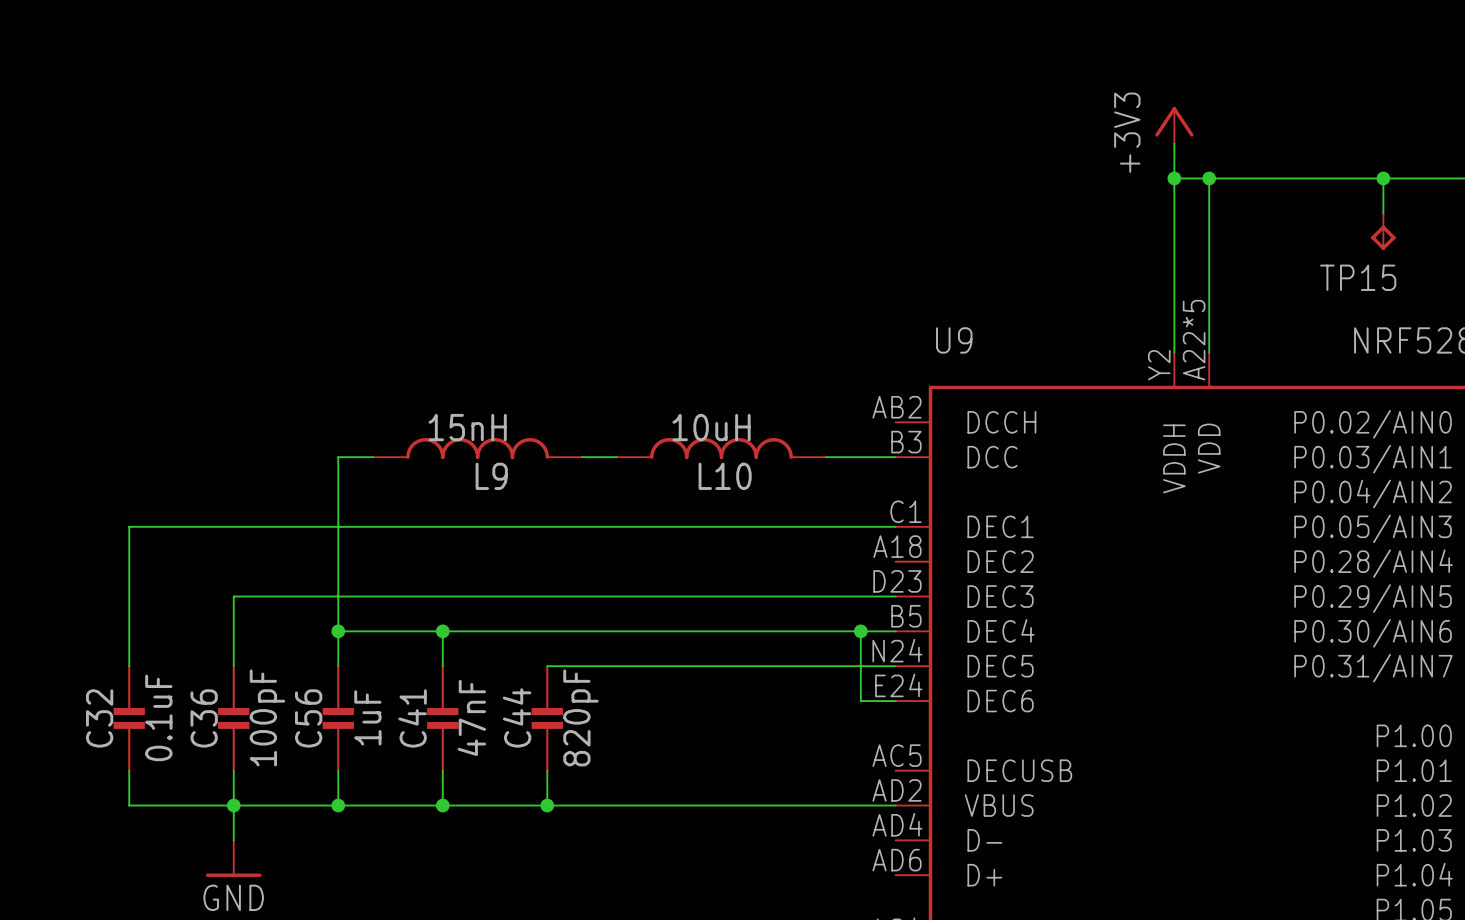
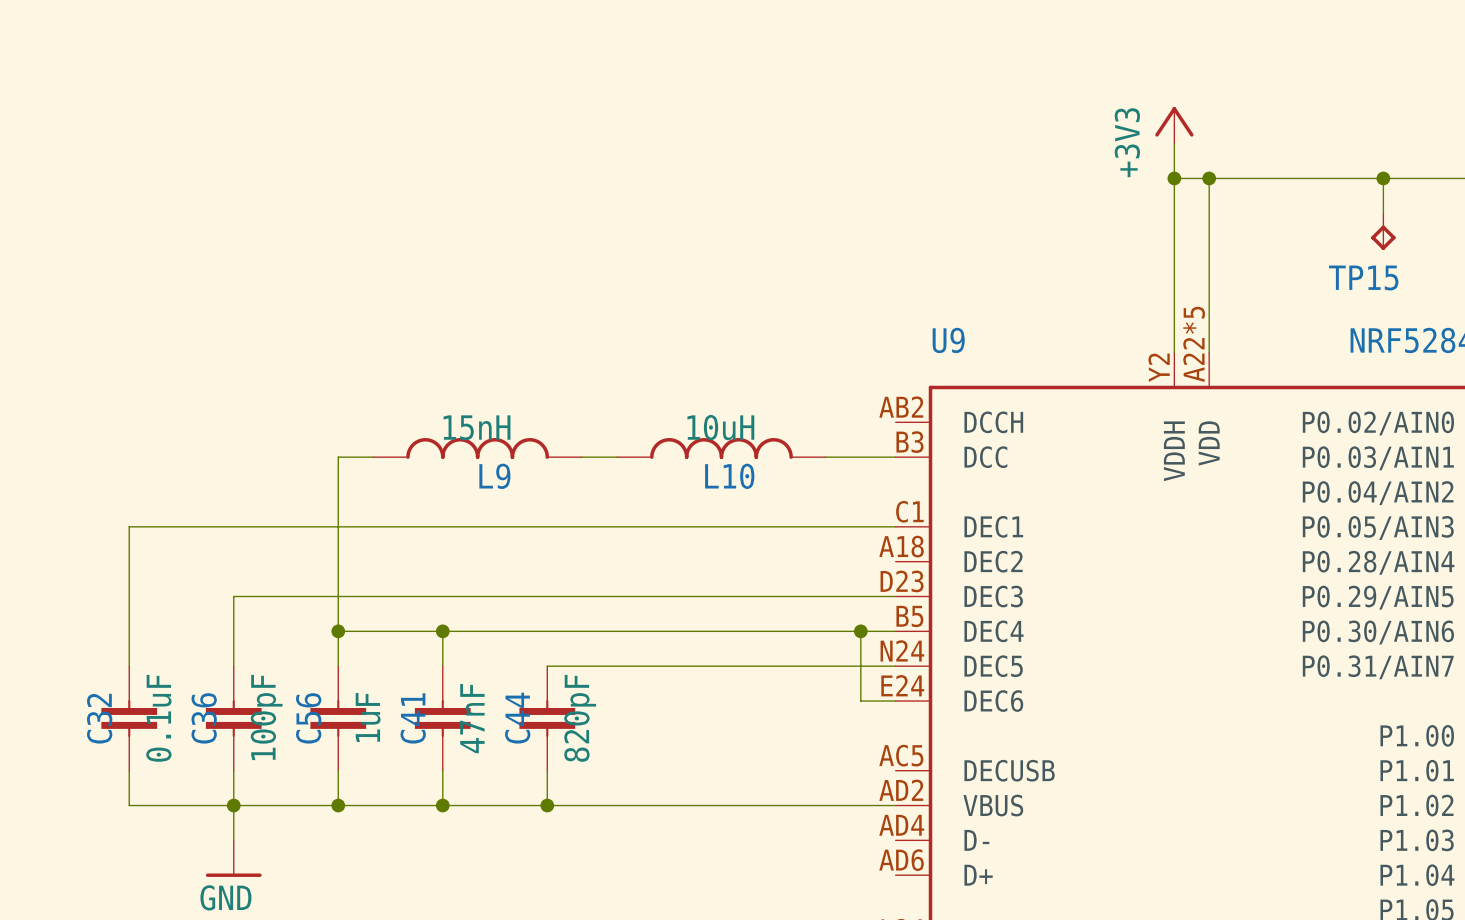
C32 symbol: [113, 665, 145, 772] -> [101, 666, 158, 771]
C36 symbol: [218, 665, 250, 772] -> [205, 666, 262, 771]
C56 symbol: [322, 665, 354, 772] -> [310, 666, 367, 771]
C41 symbol: [427, 665, 459, 772] -> [414, 666, 471, 771]
C44 symbol: [531, 665, 563, 772] -> [519, 666, 576, 771]

